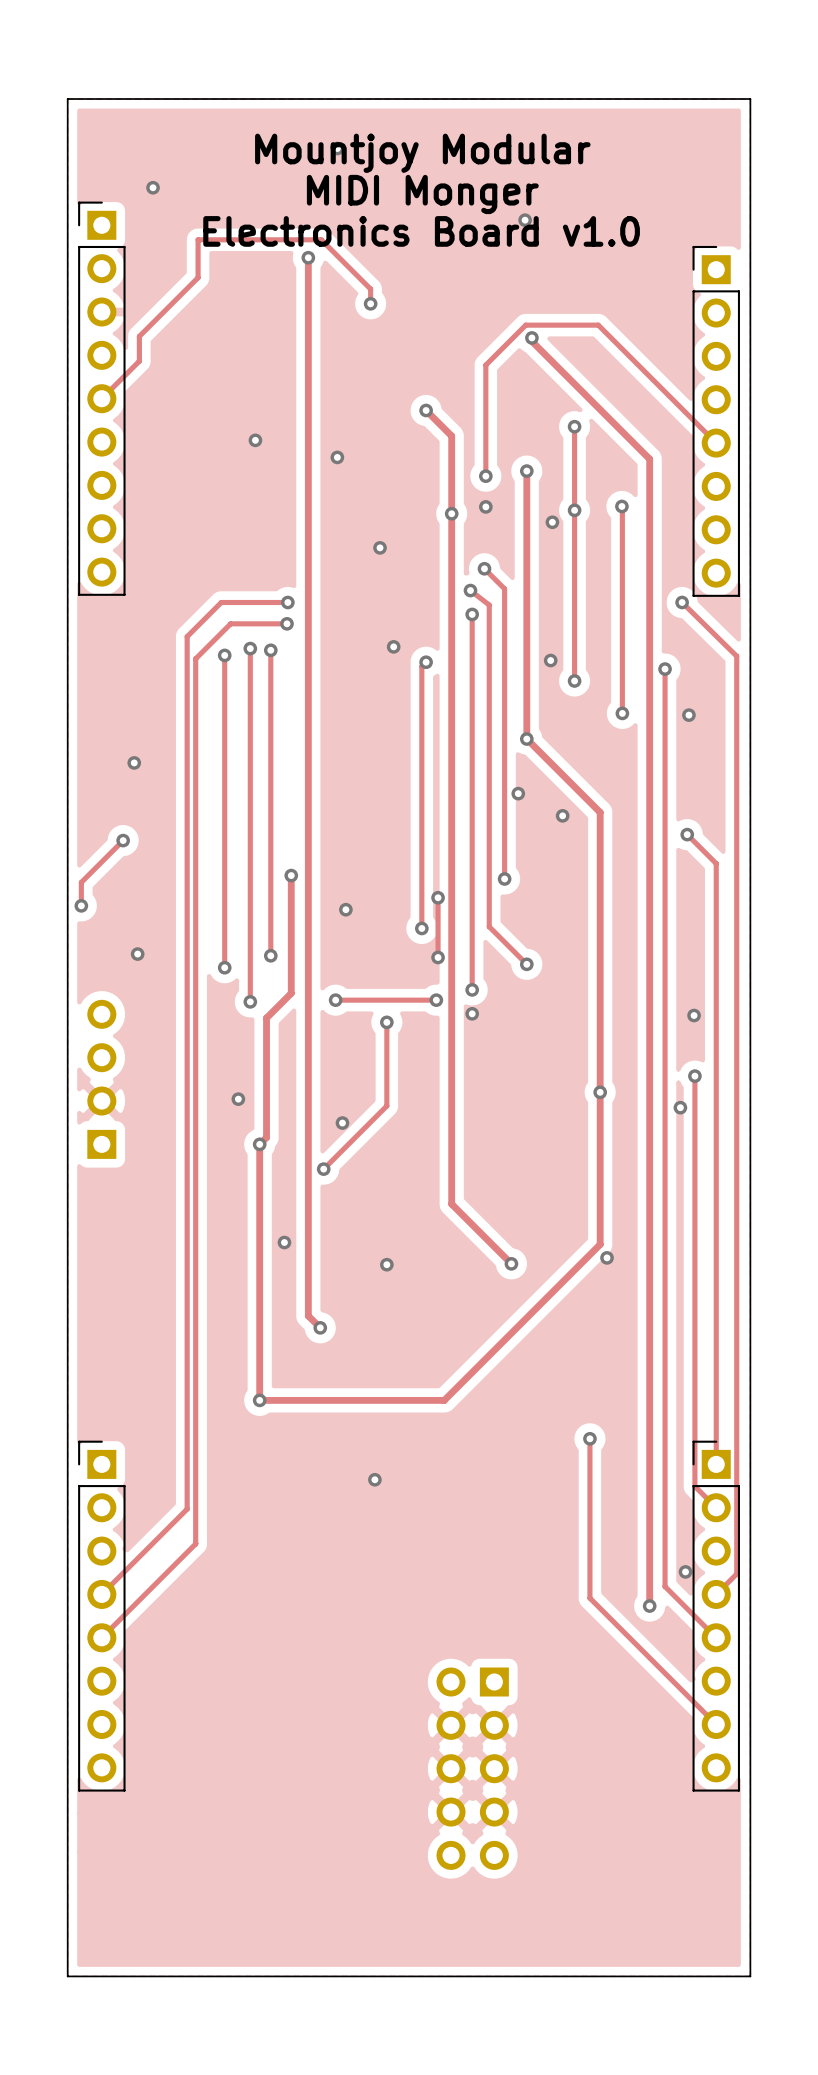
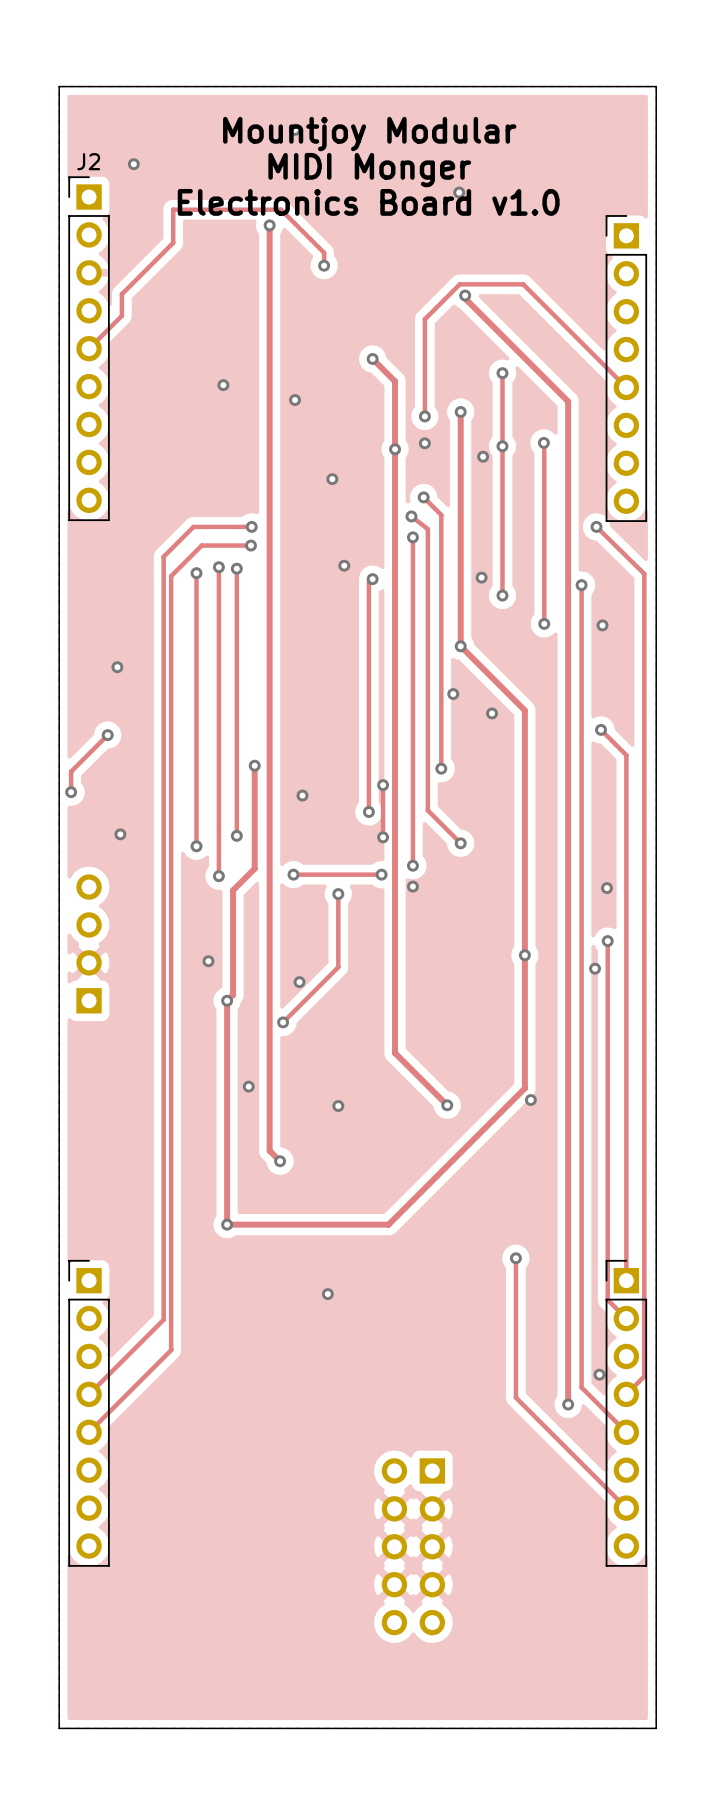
J2 name: none -> J2 (88, 161)

